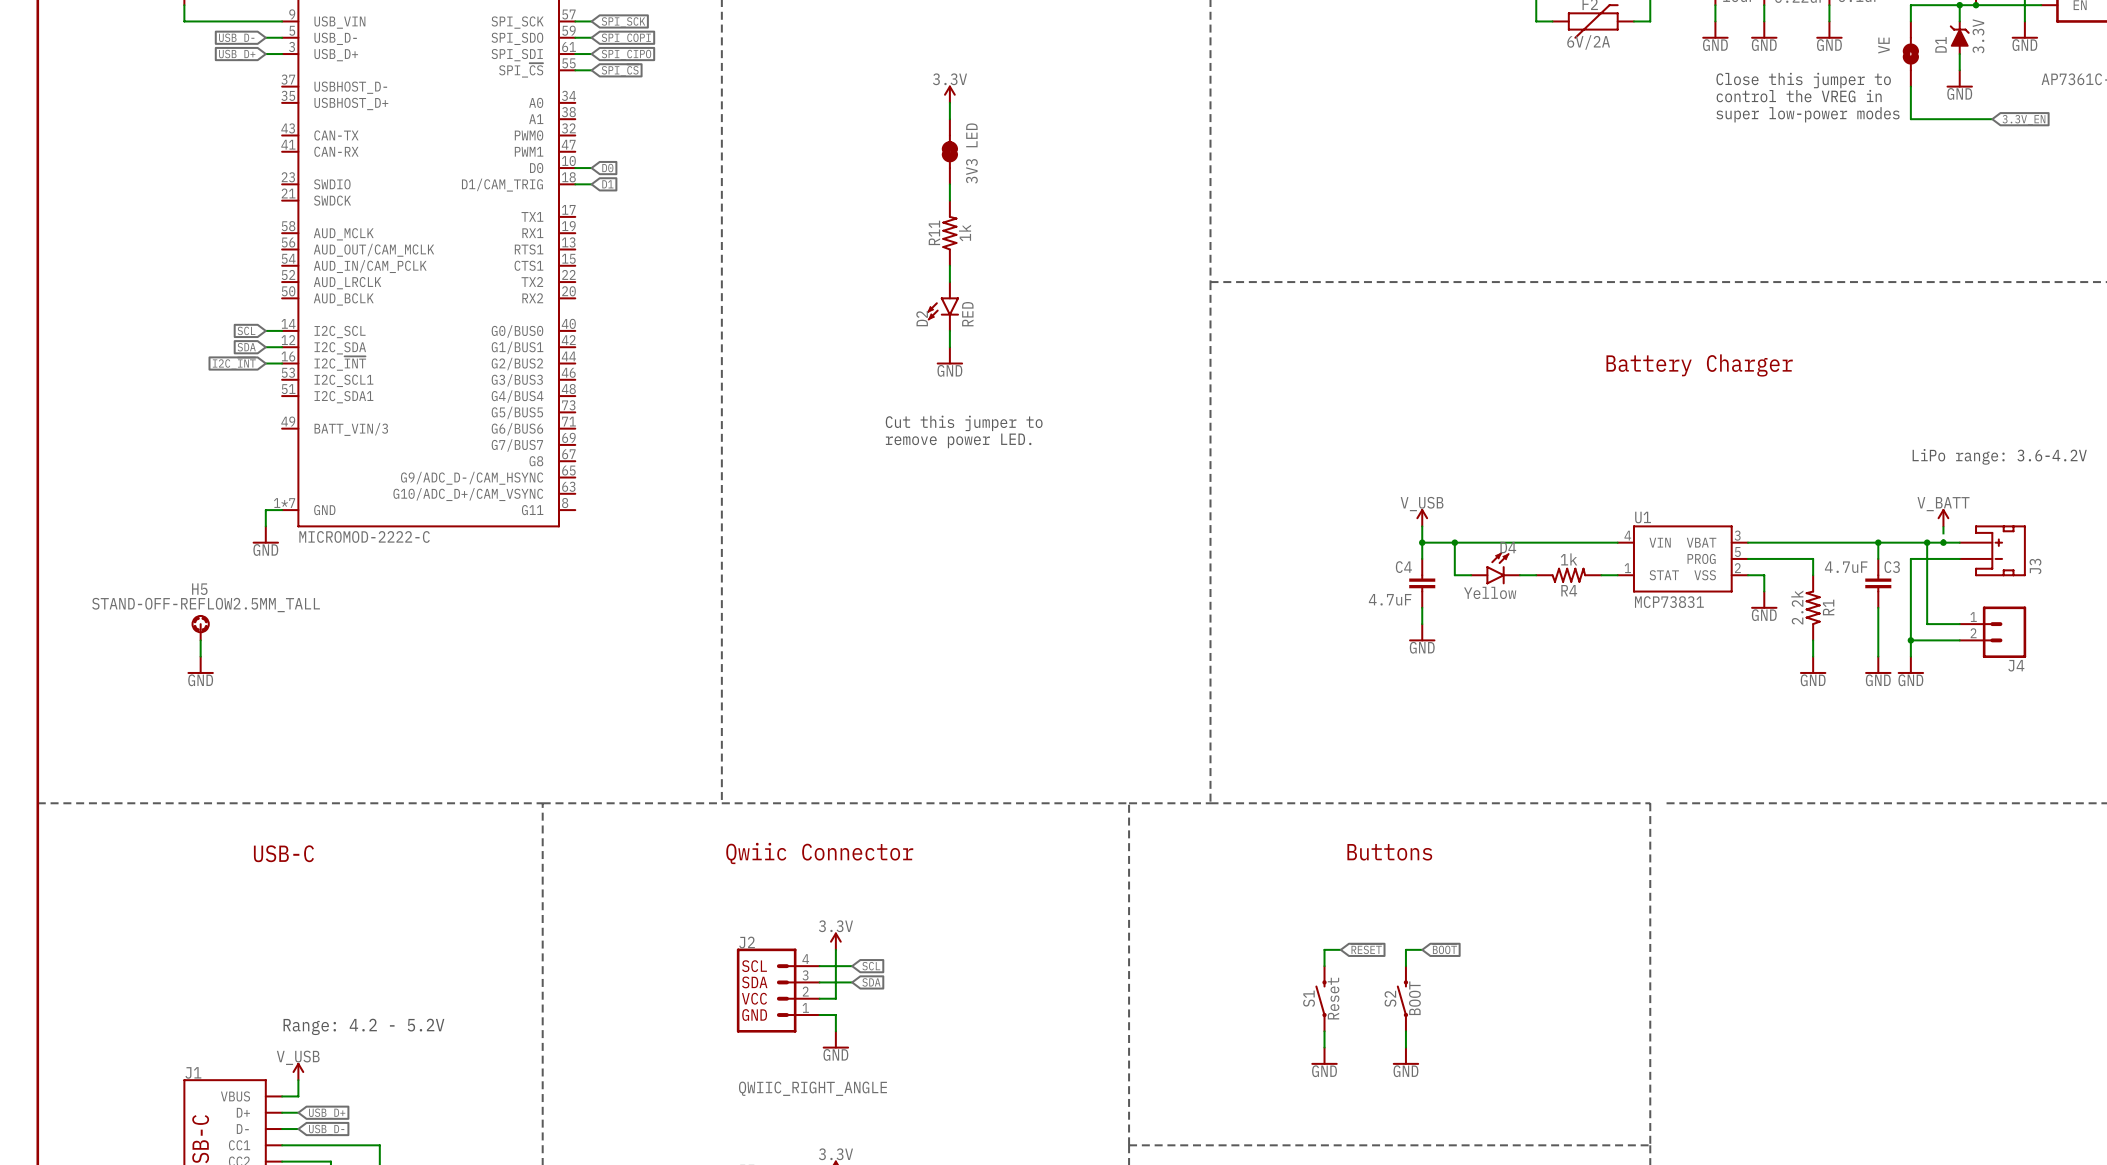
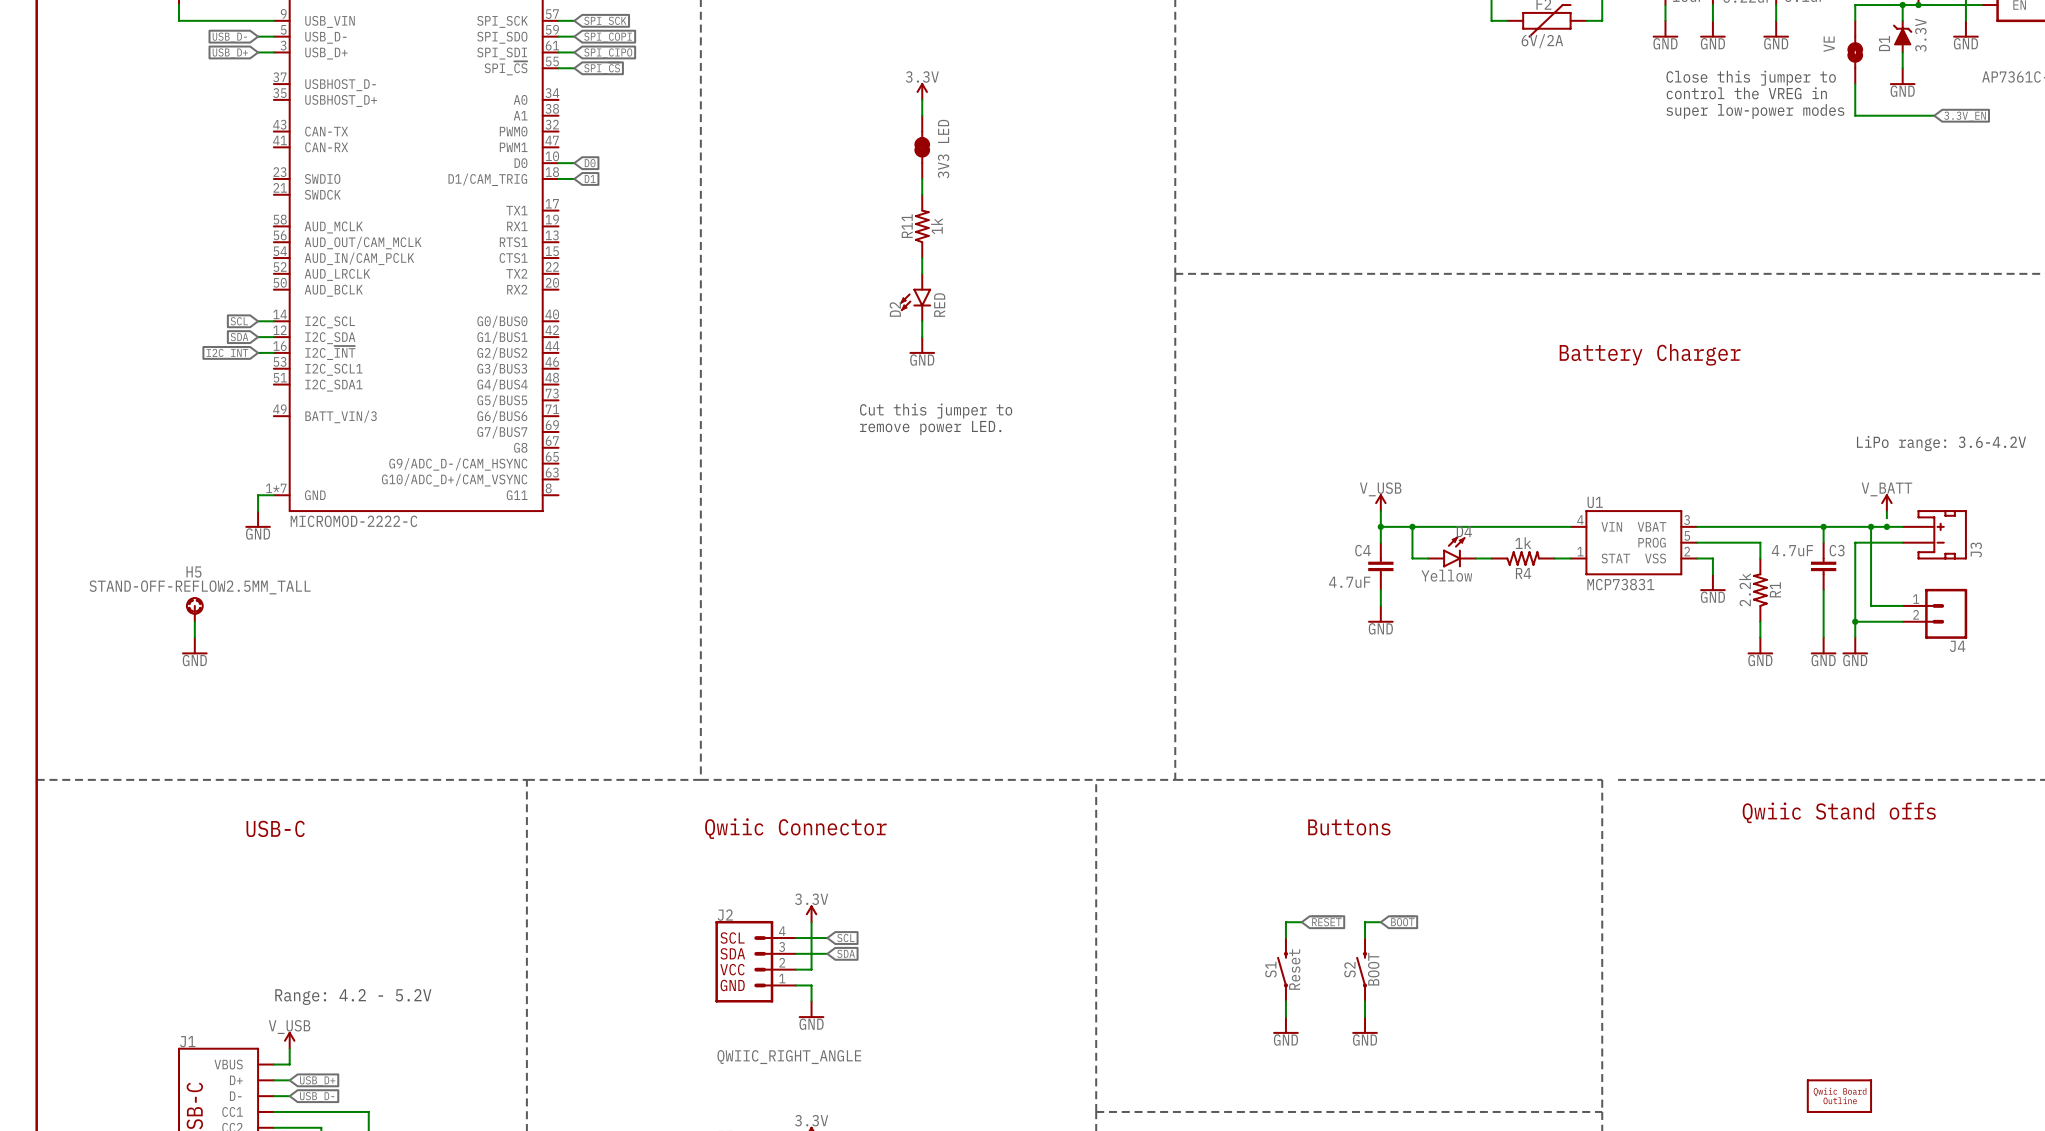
text: none -> Qwiic Stand offs (1839, 812)
part: none -> (1839, 1096)

